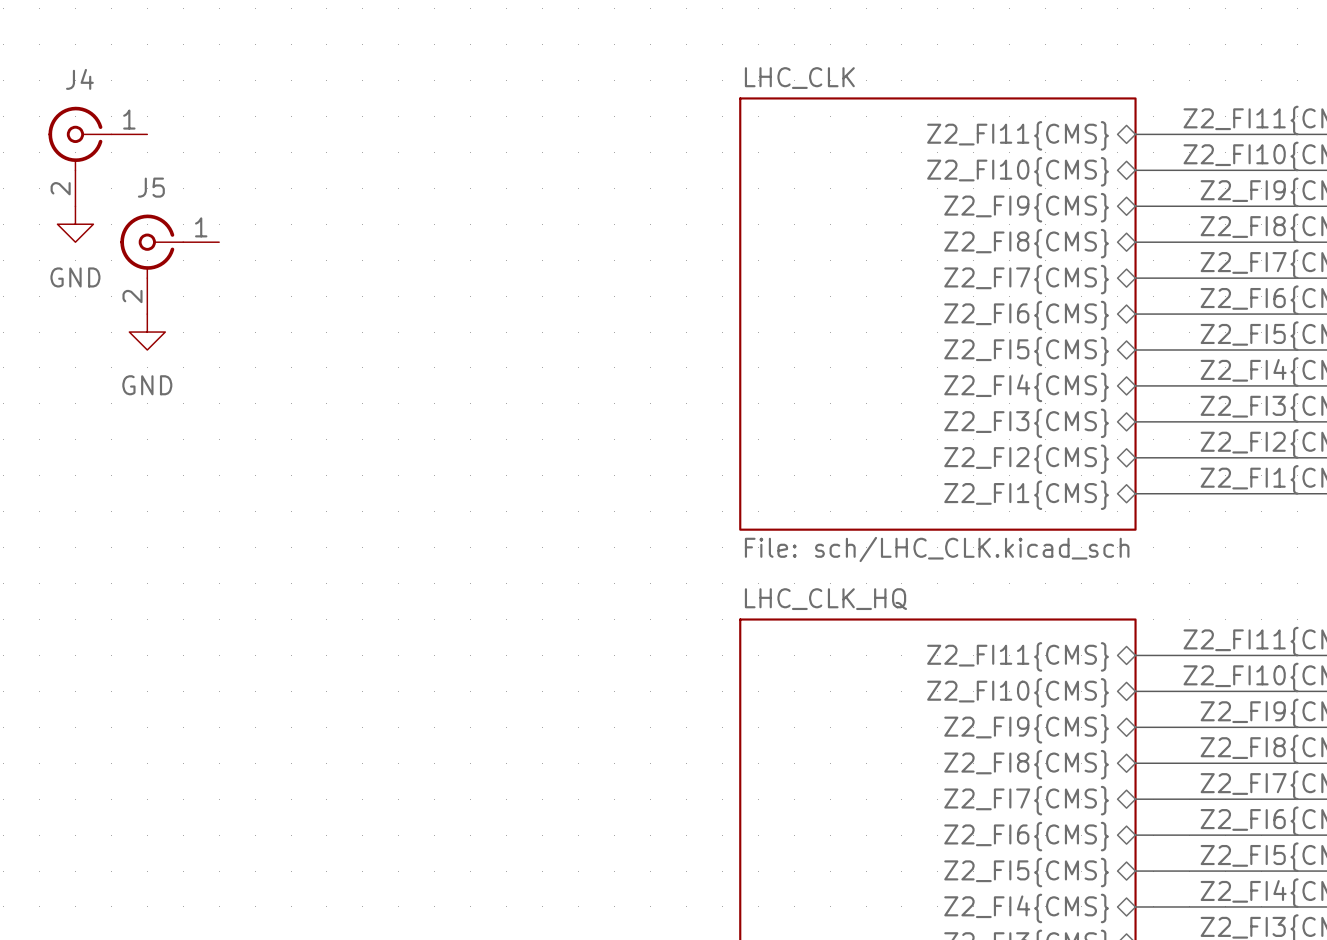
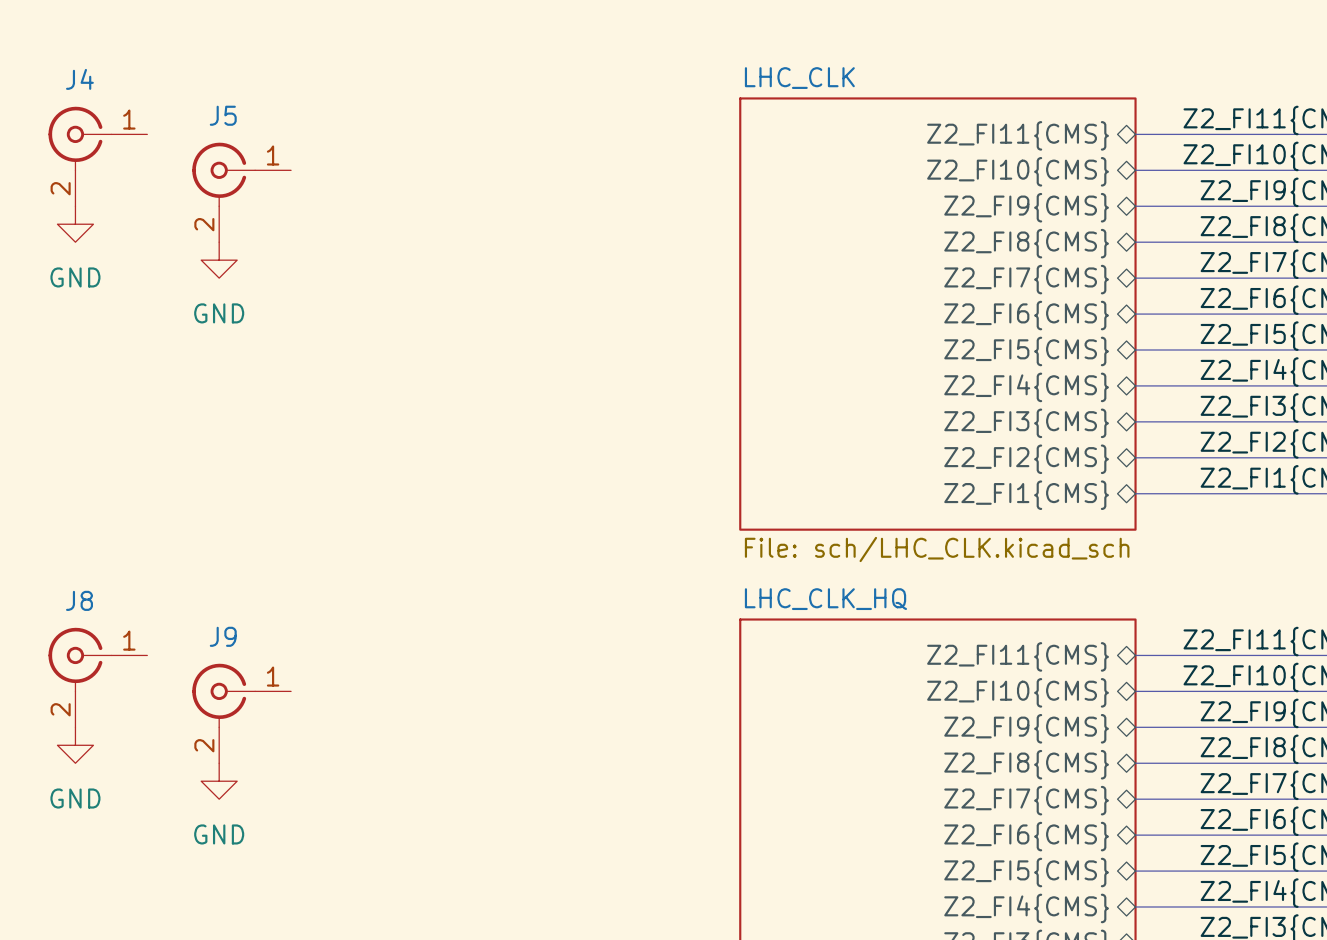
J5 position: (169, 264) -> (241, 192)
power symbol position: GND (147, 332) -> GND (219, 260)
J8: none -> (97, 677)
J9: none -> (241, 713)
power symbol: none -> GND (75, 745)
power symbol: none -> GND (219, 781)

